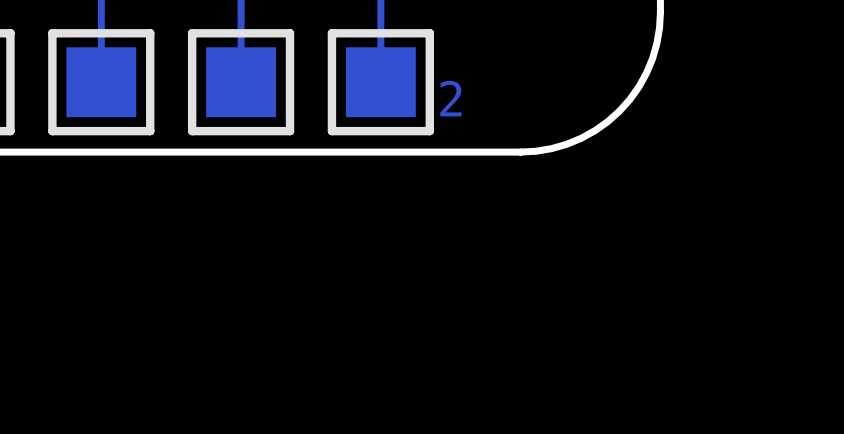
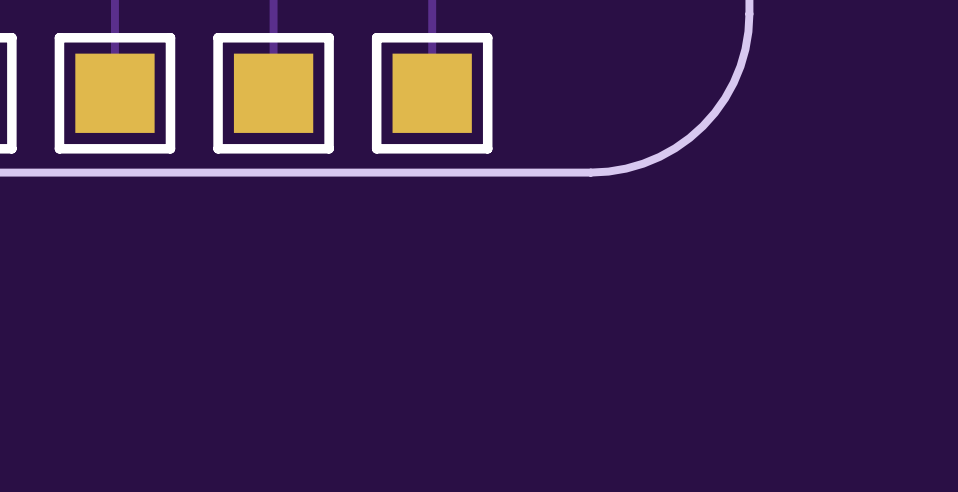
text: 2 (450, 98) -> none

